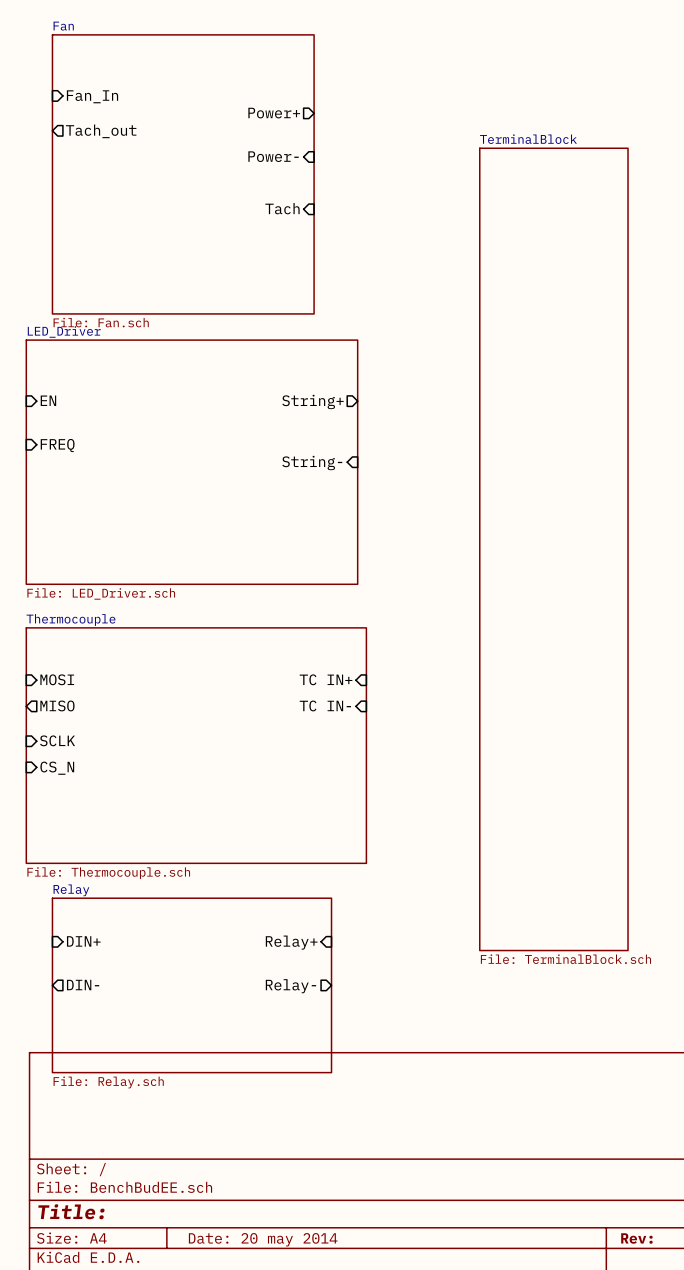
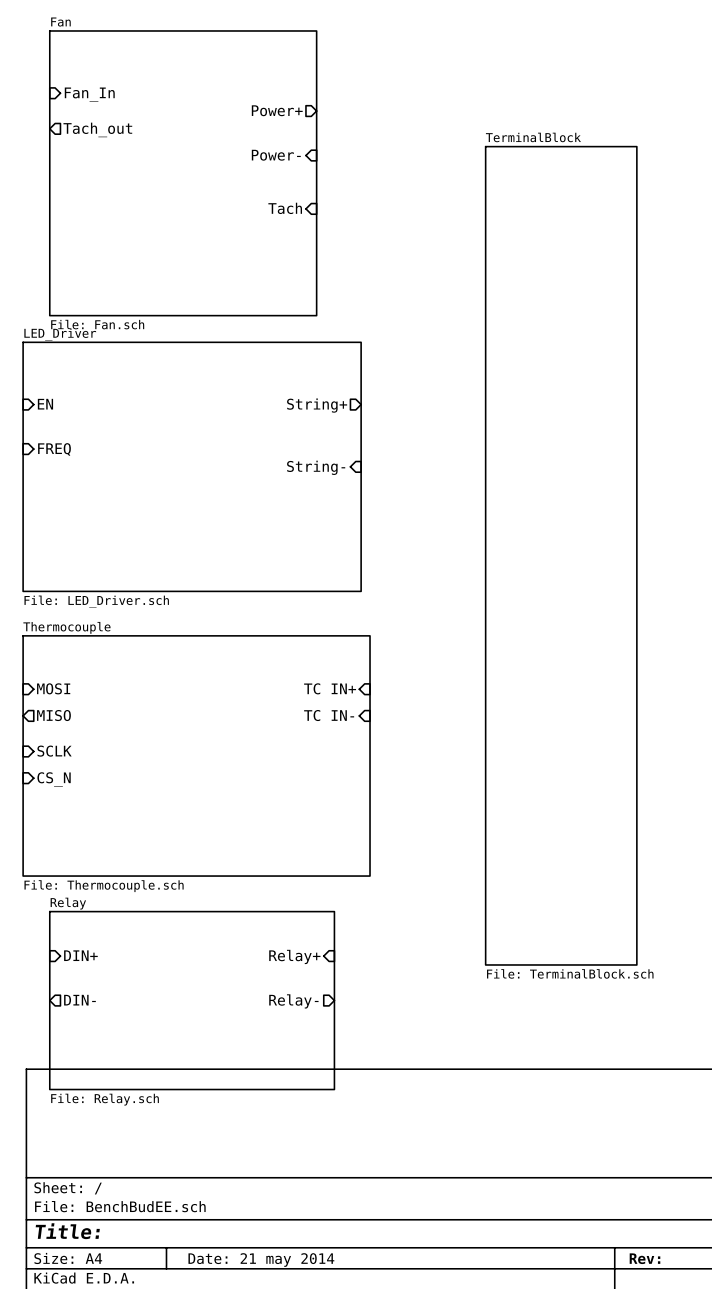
title block: Date: 20 may 2014 (263, 1239) -> Date: 21 may 2014 (261, 1260)

